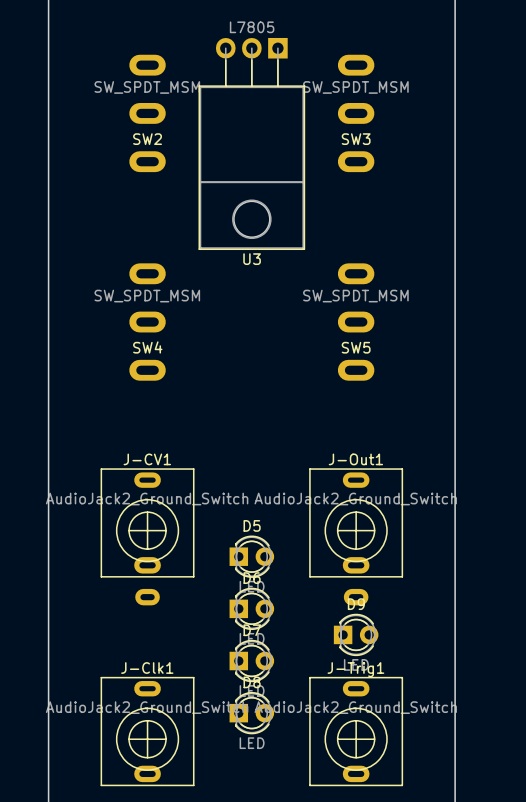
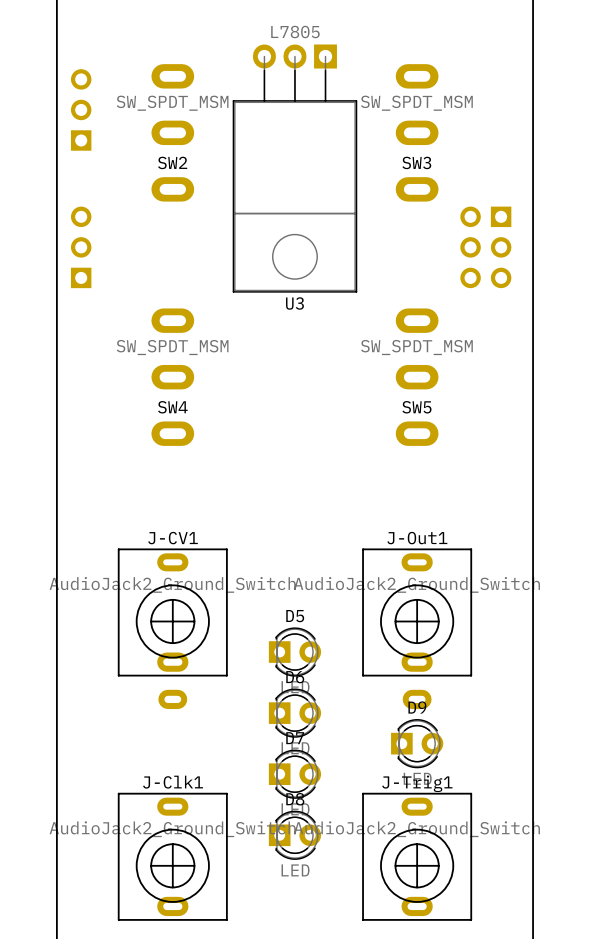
U3 footprint: [198, 37, 306, 250] -> [232, 44, 358, 293]
part: none -> (81, 109)
part: none -> (81, 247)
part: none -> (485, 247)

